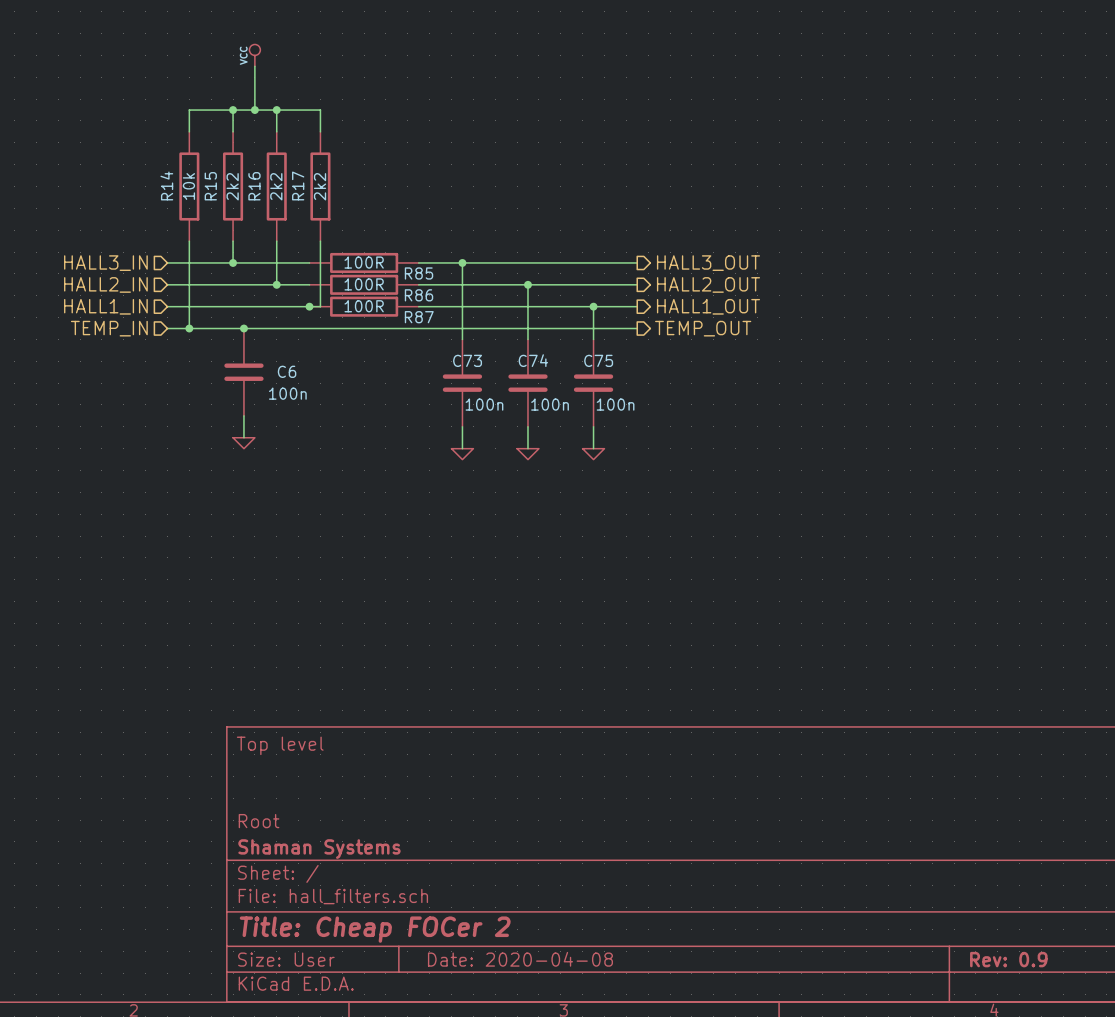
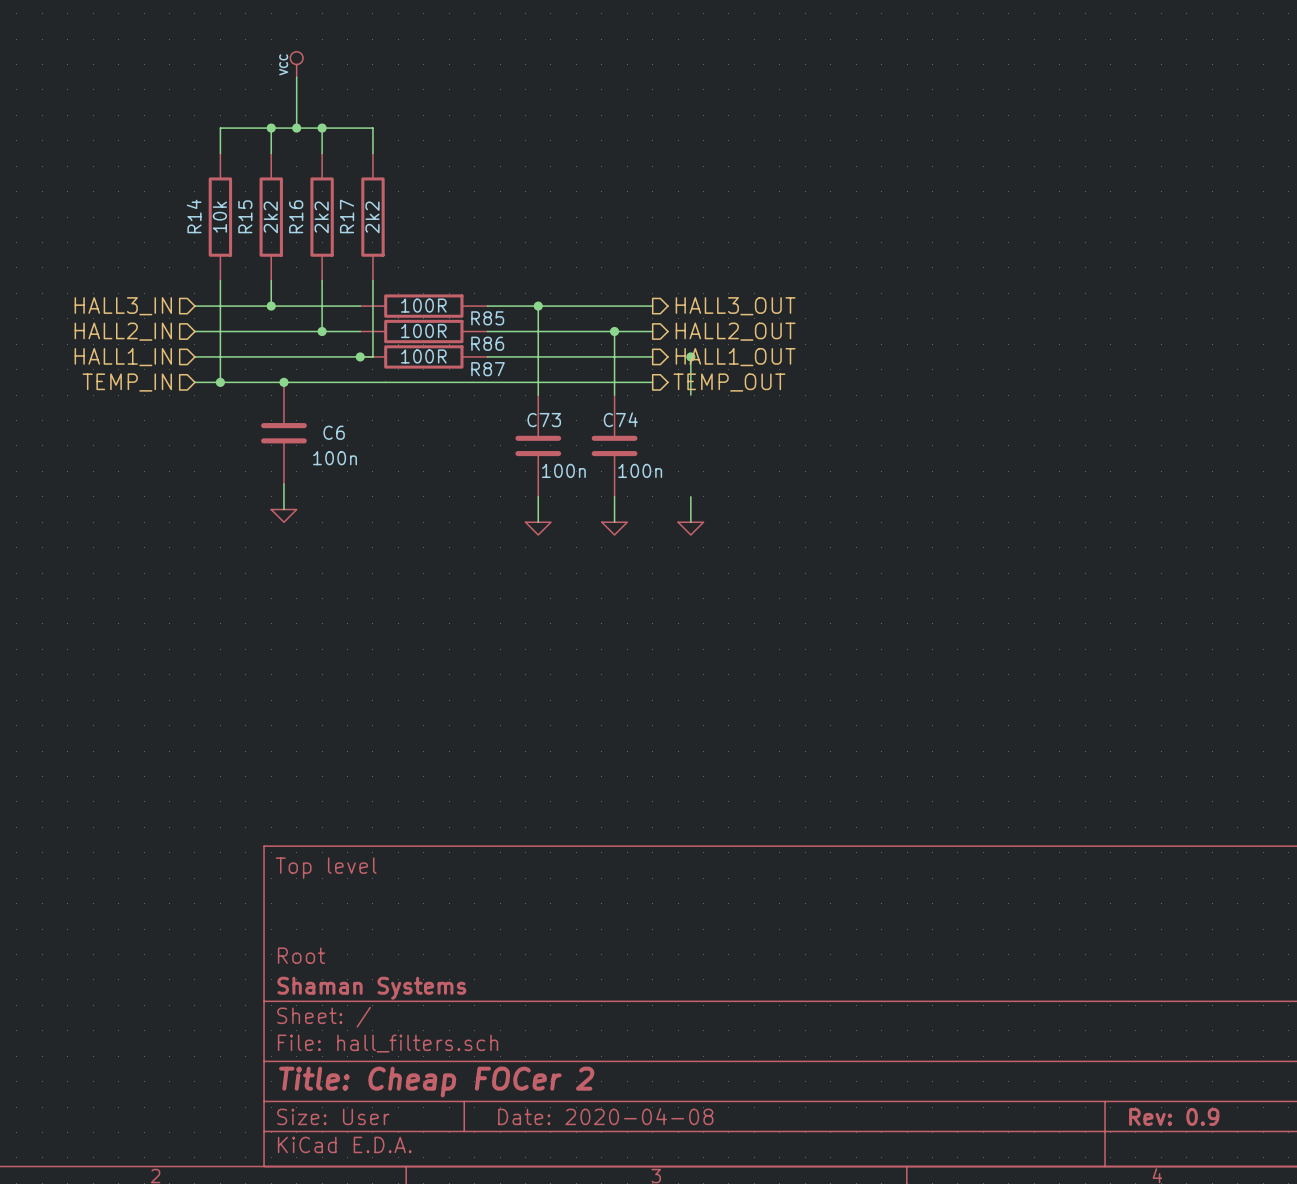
wire: (560, 262) (637, 262) -> none
hierarchical label position: HALL3_OUT (708, 263) -> HALL3_OUT (735, 306)
wire: (560, 284) (637, 284) -> none
hierarchical label position: HALL2_OUT (708, 284) -> HALL2_OUT (735, 331)
wire: (560, 306) (637, 306) -> none
hierarchical label position: HALL1_OUT (708, 306) -> HALL1_OUT (735, 357)
wire: (560, 328) (637, 328) -> none
hierarchical label position: TEMP_OUT (703, 328) -> TEMP_OUT (729, 382)
C75: 100n (593, 383) -> none

